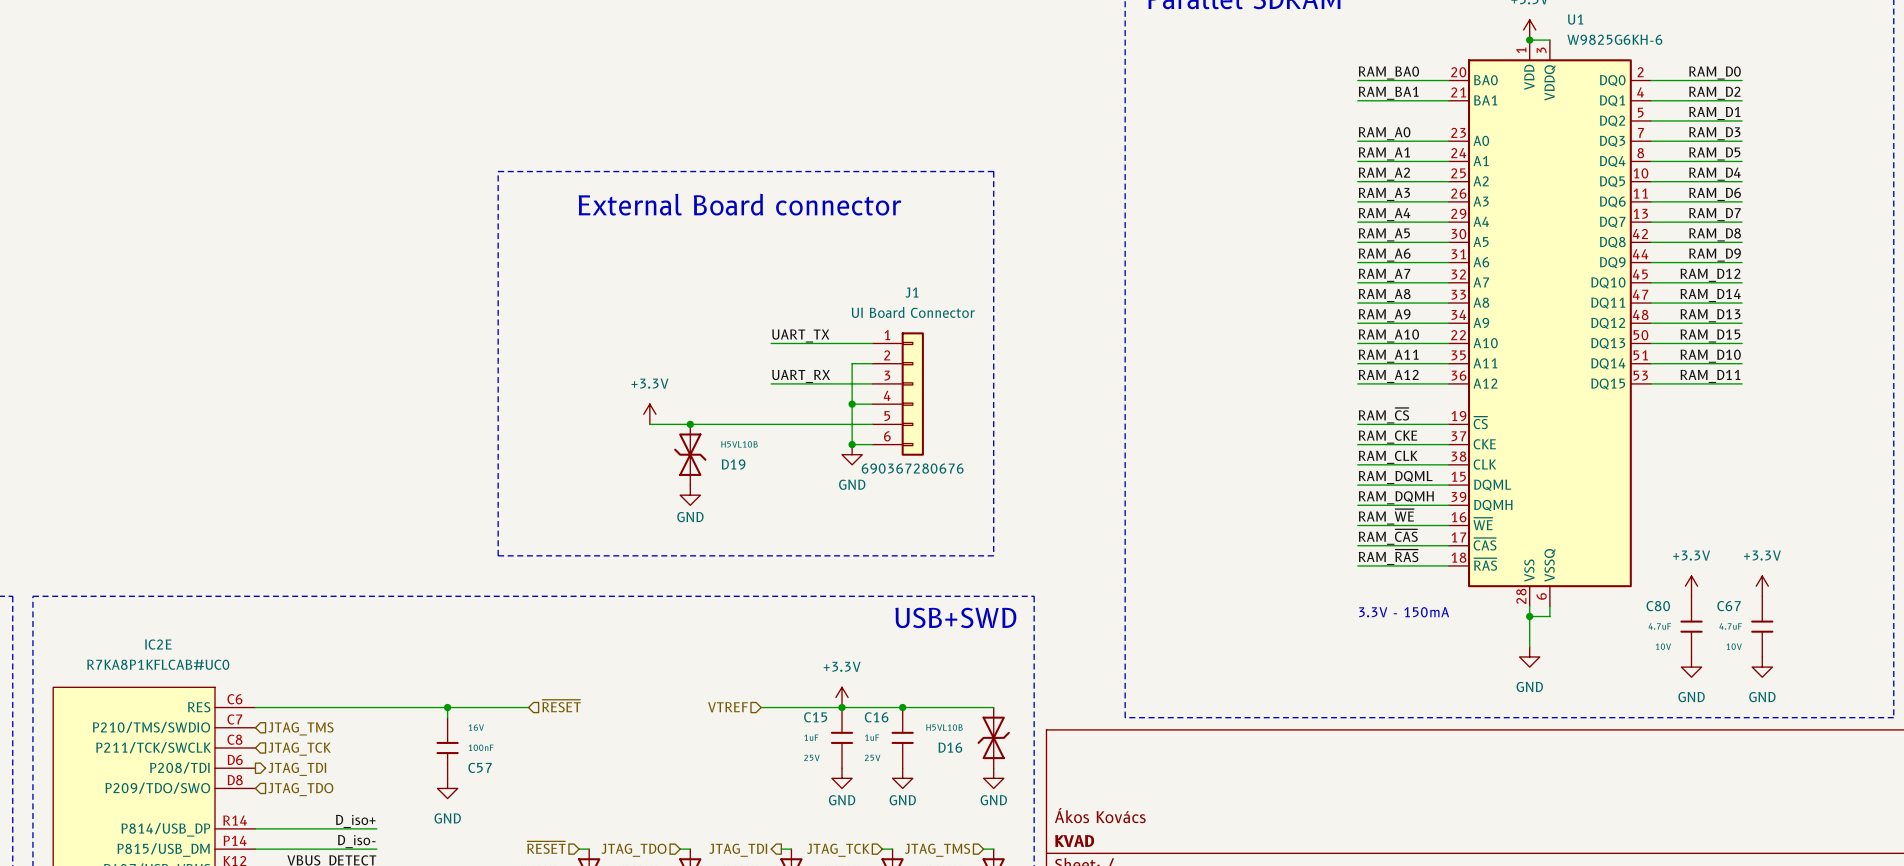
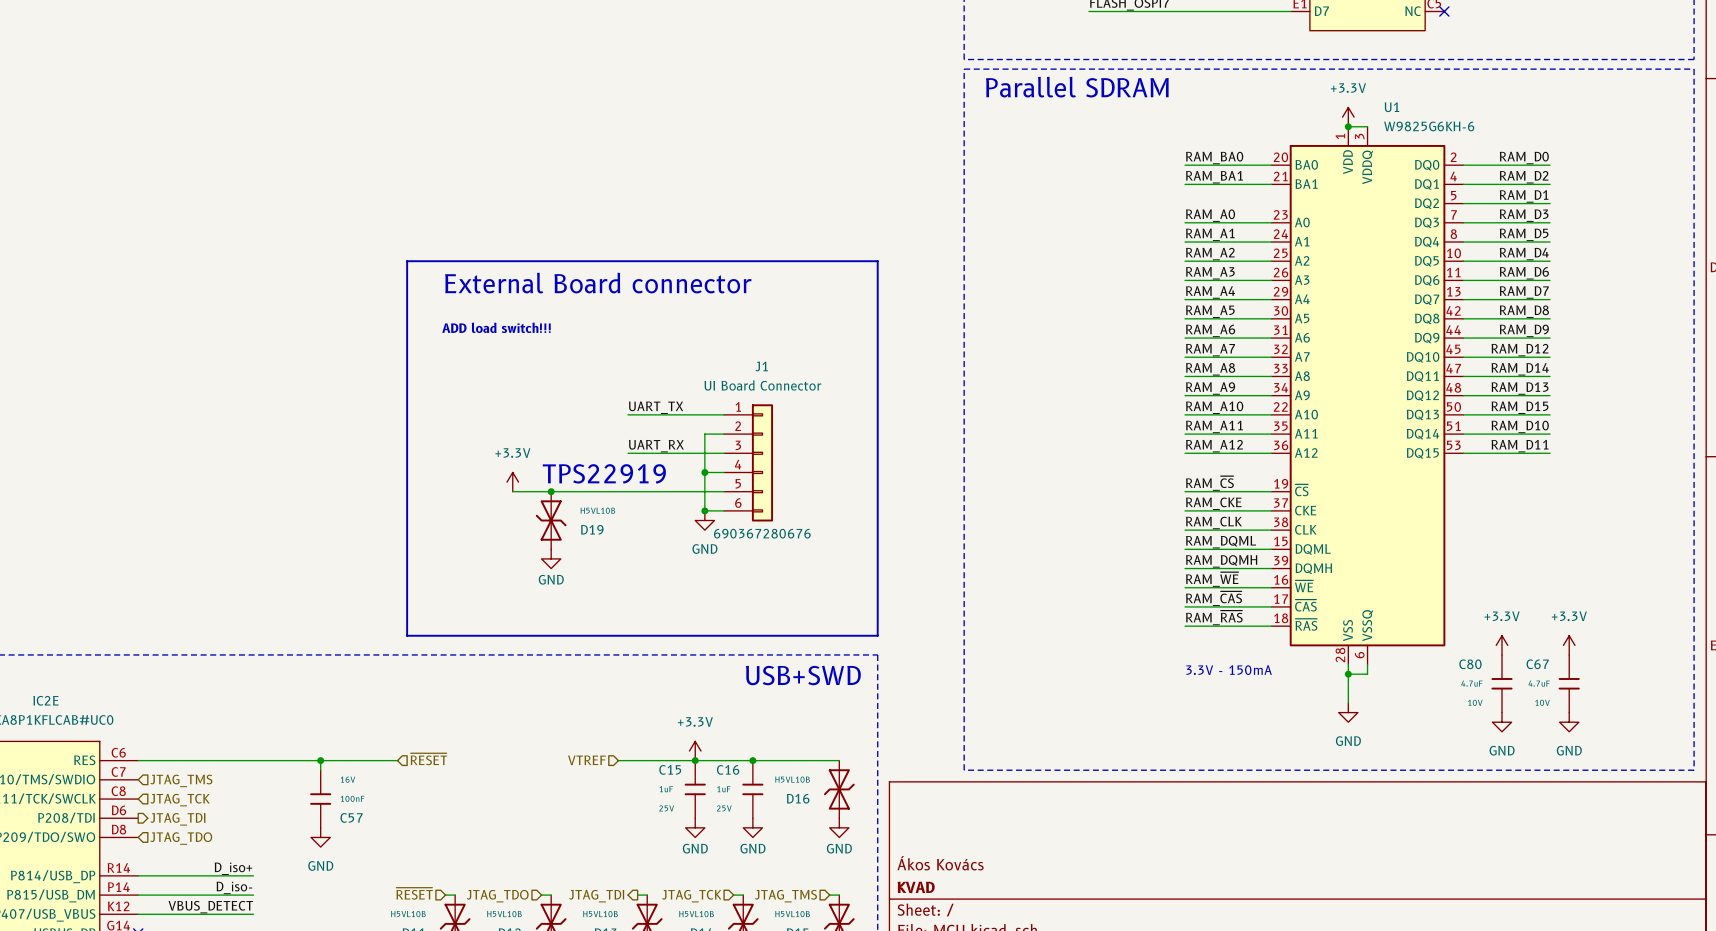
line: (498, 171) (993, 171) (993, 555) (498, 555) (498, 171) -> (407, 261) (407, 635) (877, 635) (877, 261) (407, 261)
text: none -> ADD load switch!!! (496, 327)
text: none -> TPS22919 (604, 473)

